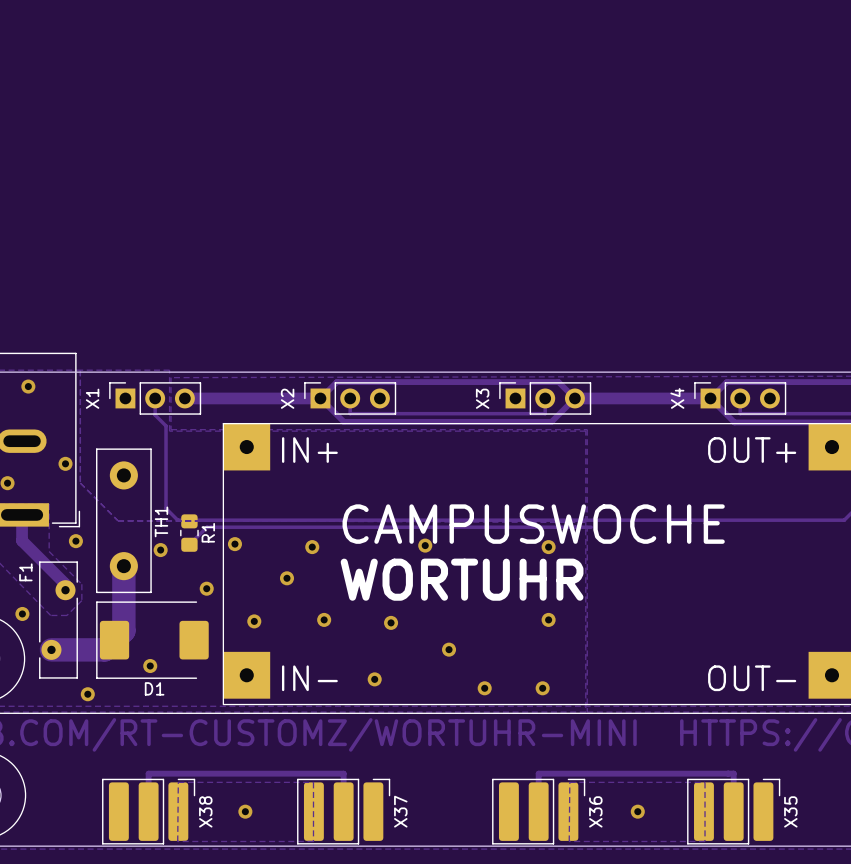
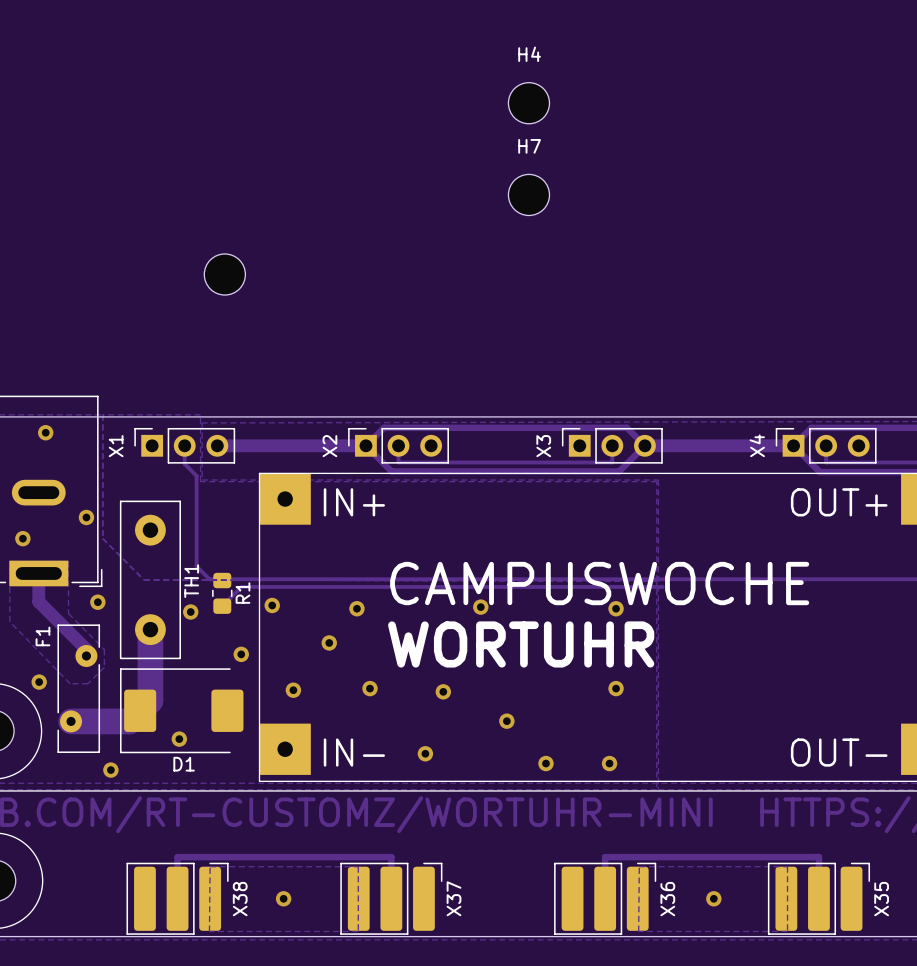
H4: none -> (528, 103)
H7: none -> (528, 194)
part: none -> (224, 274)

